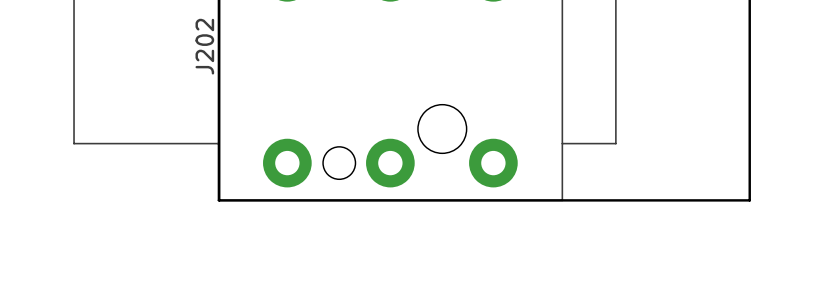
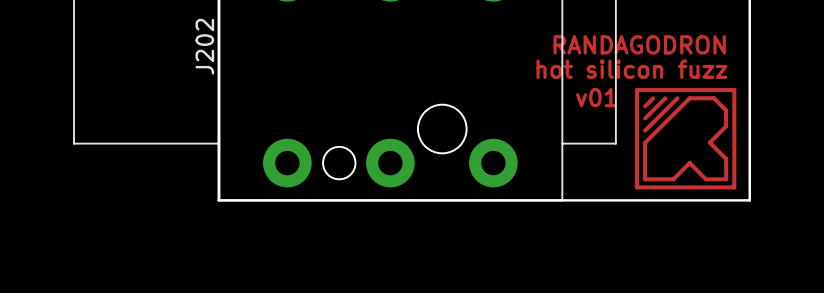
text: none -> RANDAGODRON (639, 44)
text: none -> hot silicon fuzz (631, 69)
track: none -> (636, 90) (734, 90) (734, 187) (636, 187) (636, 90)
text: none -> v01 (596, 97)
track: none -> (653, 98) (645, 106)
track: none -> (665, 98) (645, 118)
track: none -> (677, 98) (645, 130)
track: none -> (709, 142) (726, 126) (726, 110) (713, 98) (689, 98) (645, 142) (645, 179) (673, 179) (689, 163) (705, 179) (726, 179) (726, 159) (709, 142)

